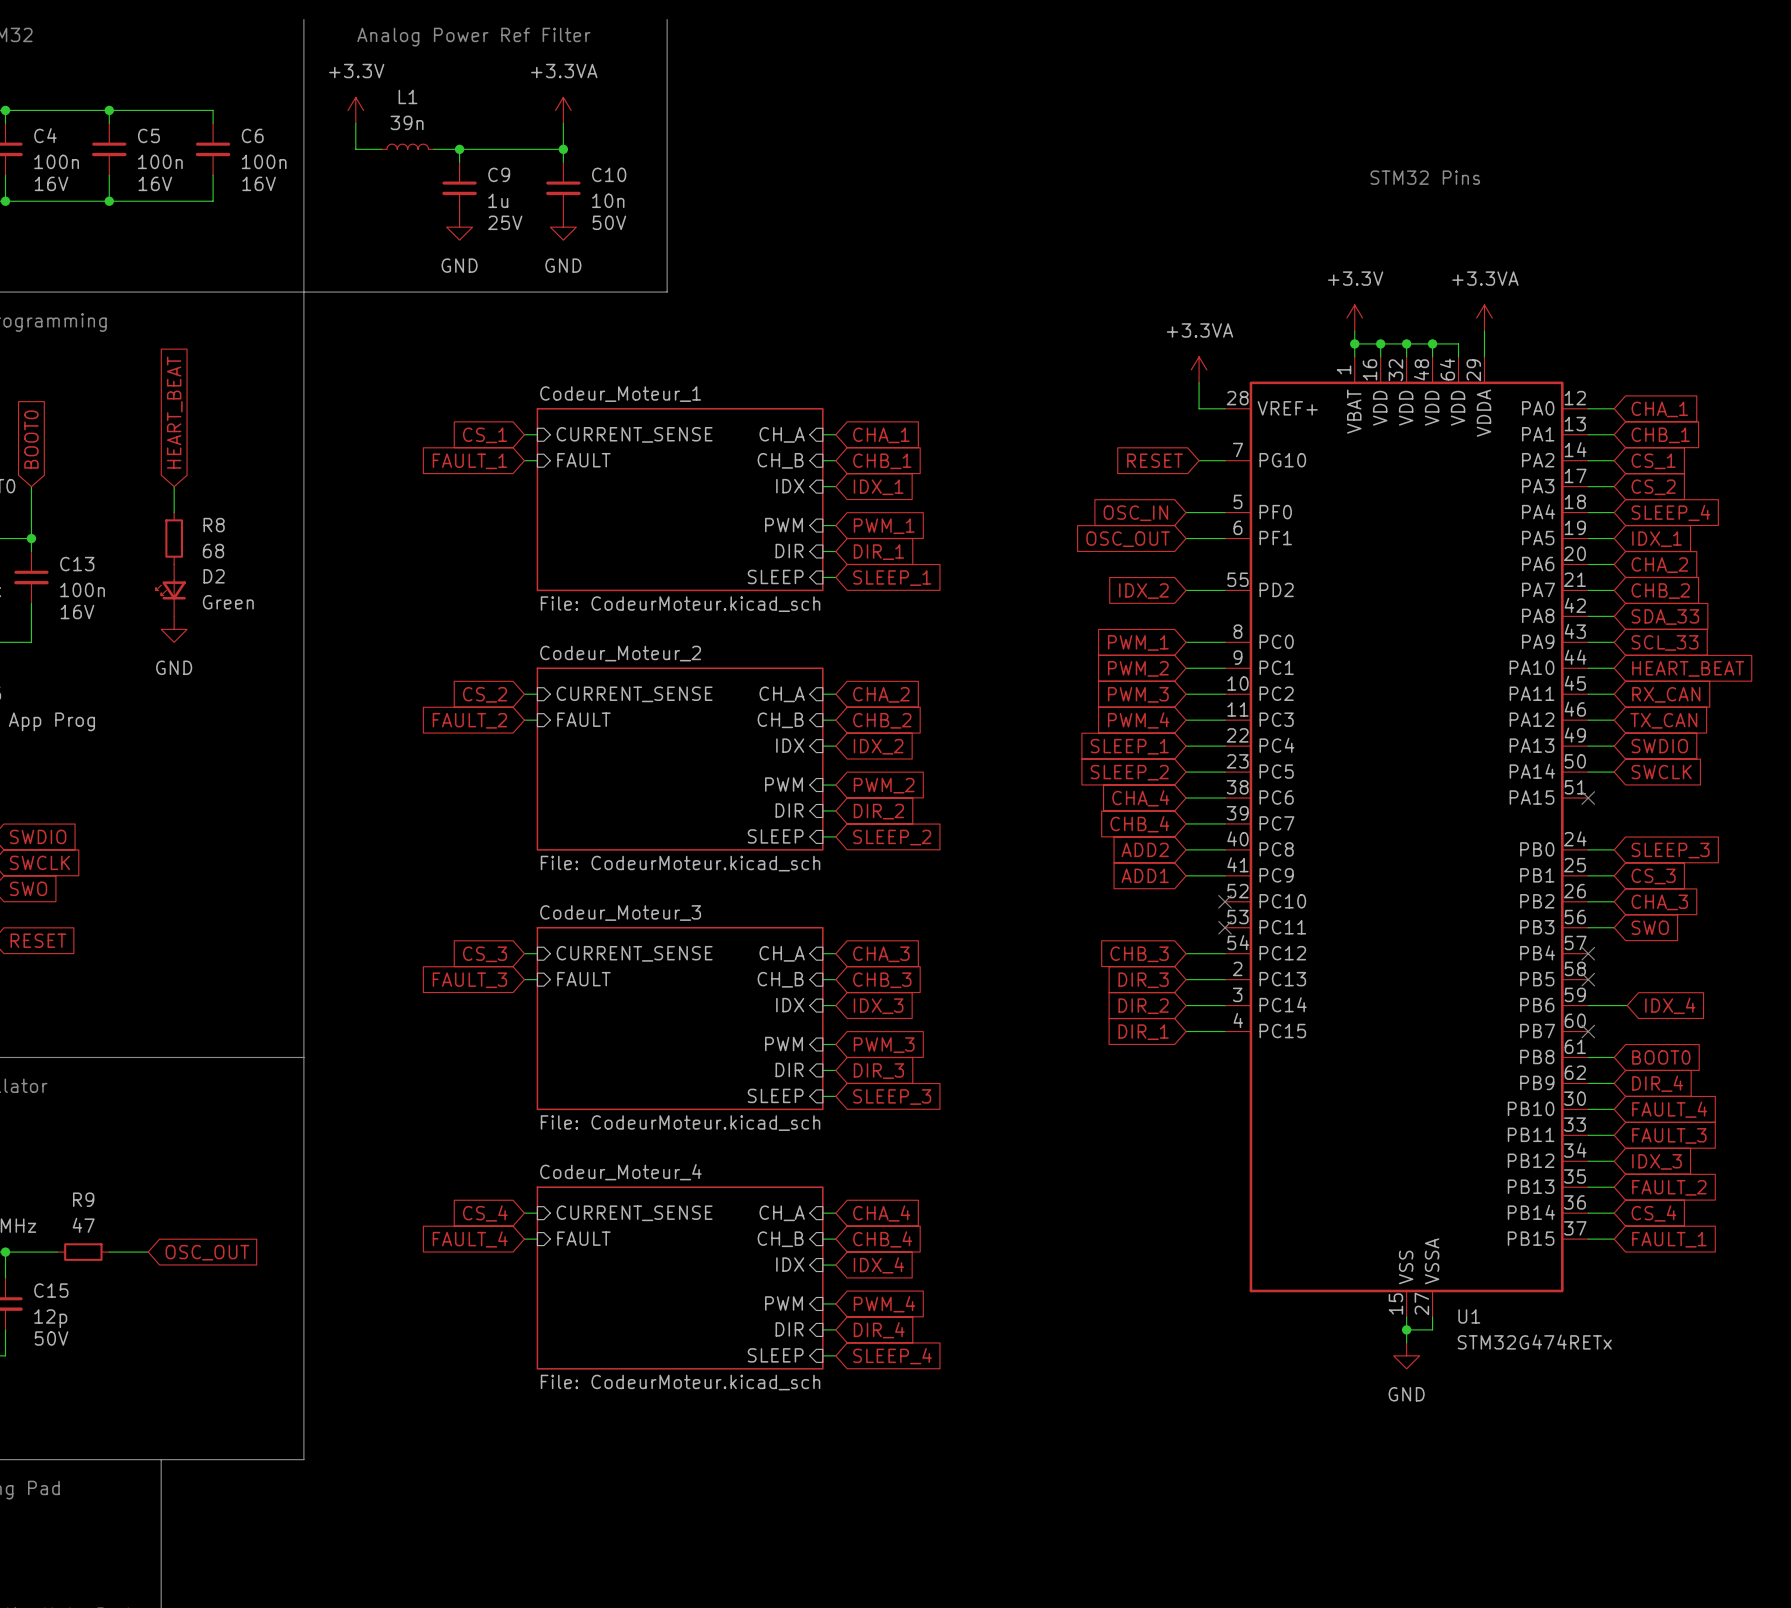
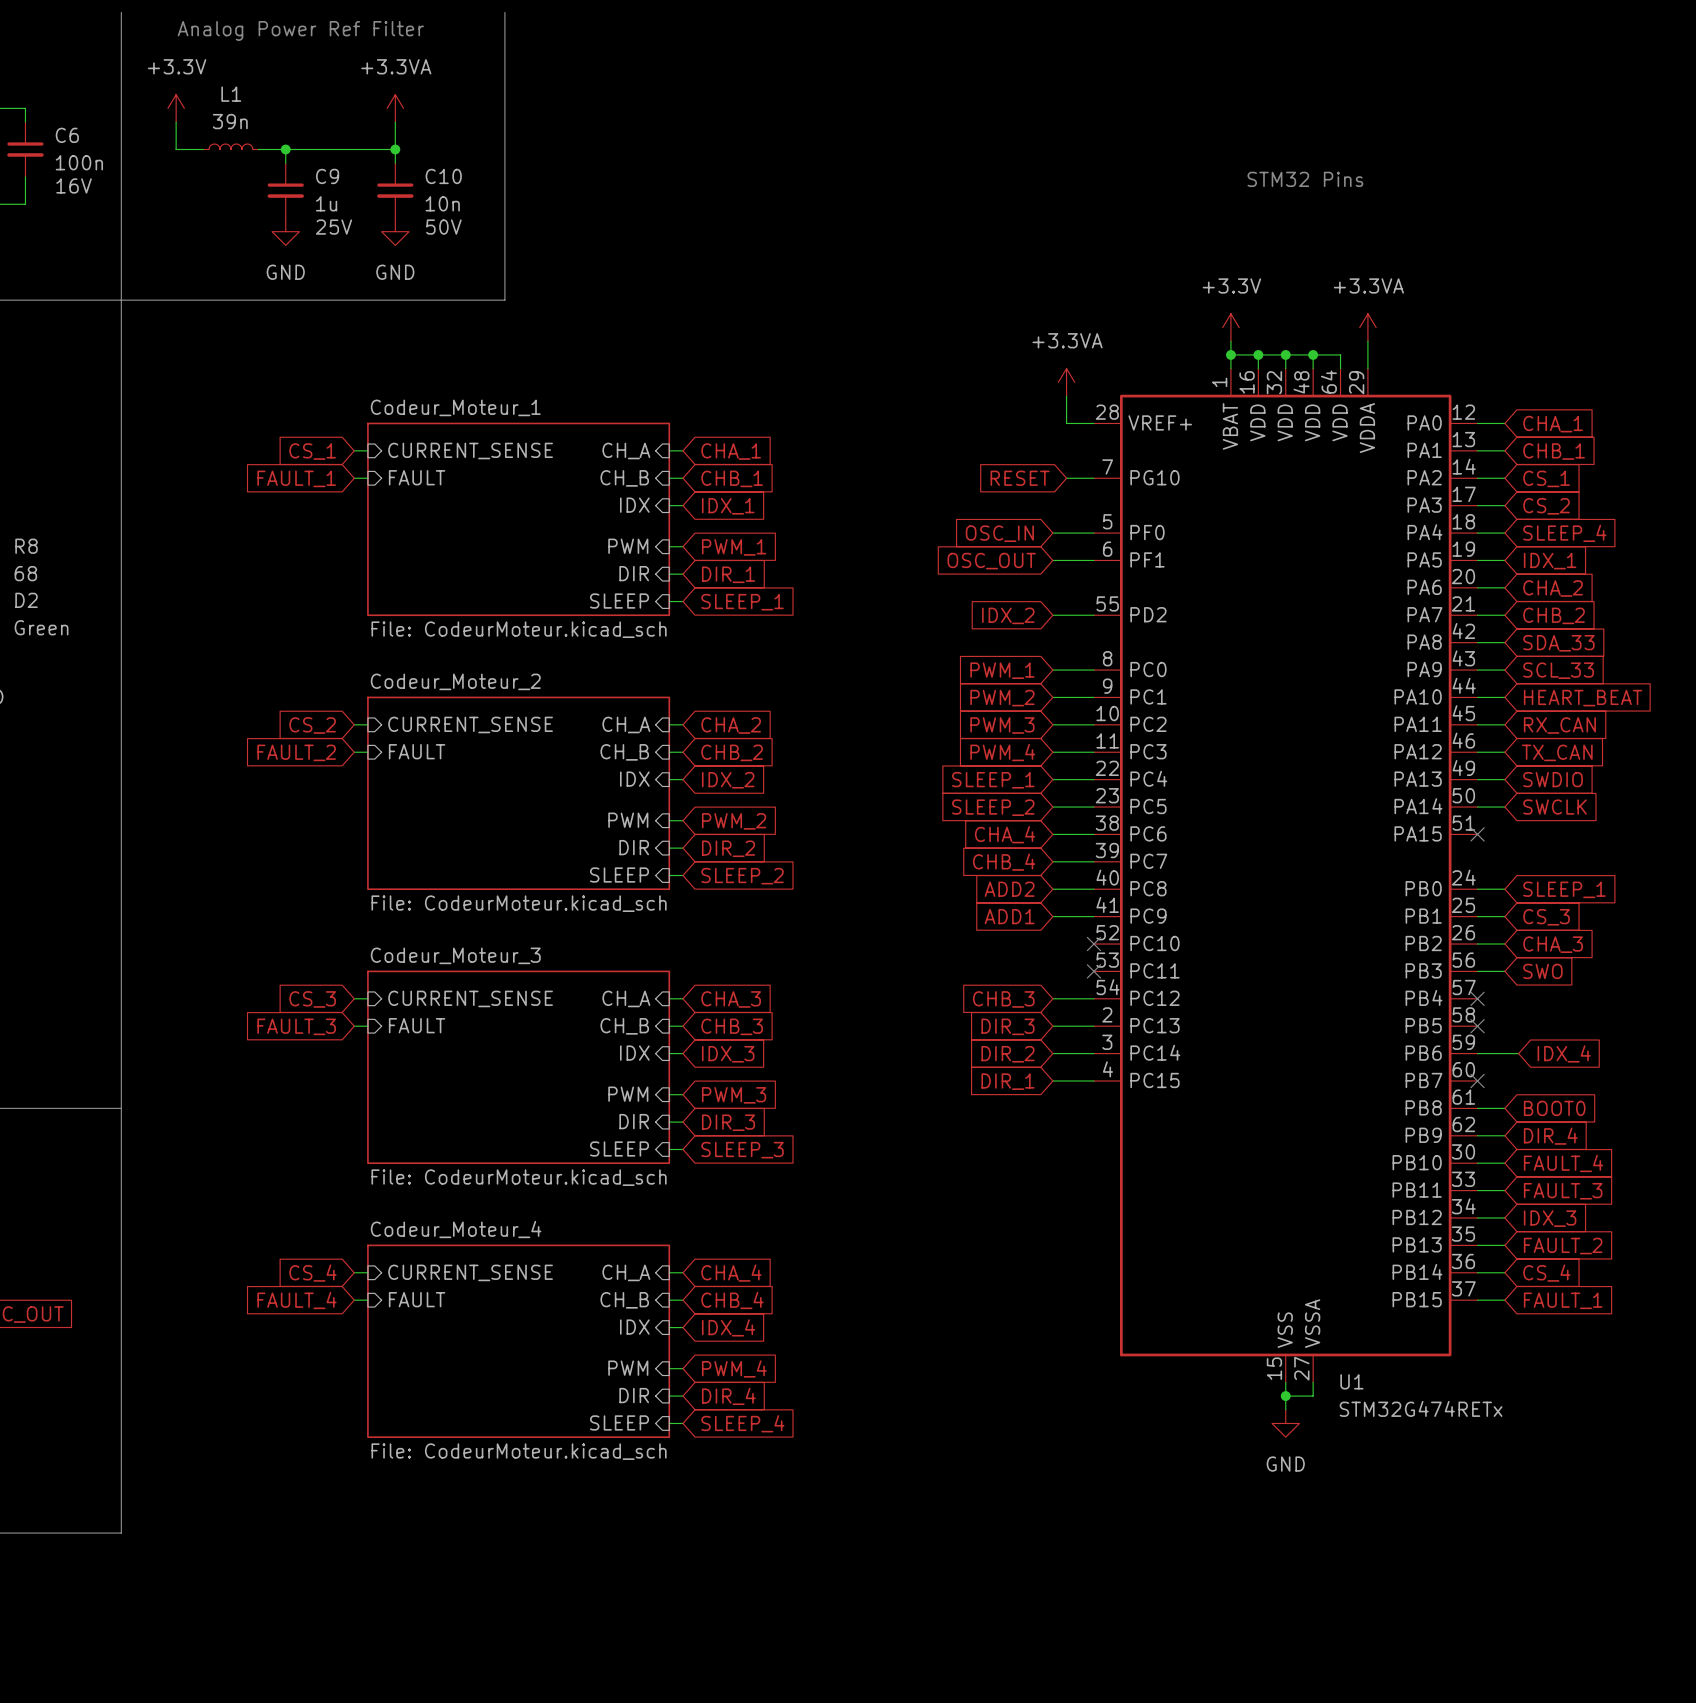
global label: SLEEP_3 (1670, 850) -> SLEEP_1 (1564, 889)

